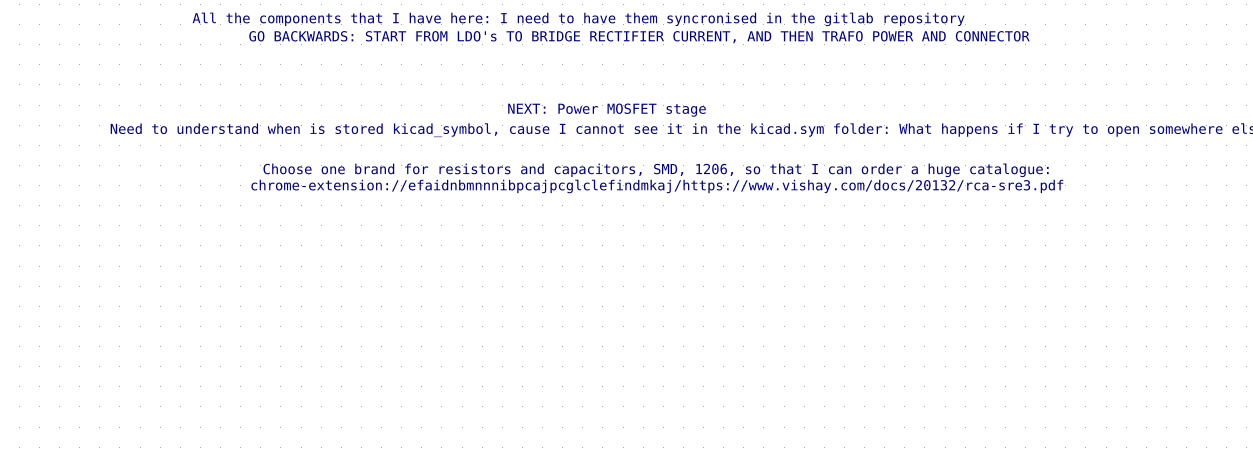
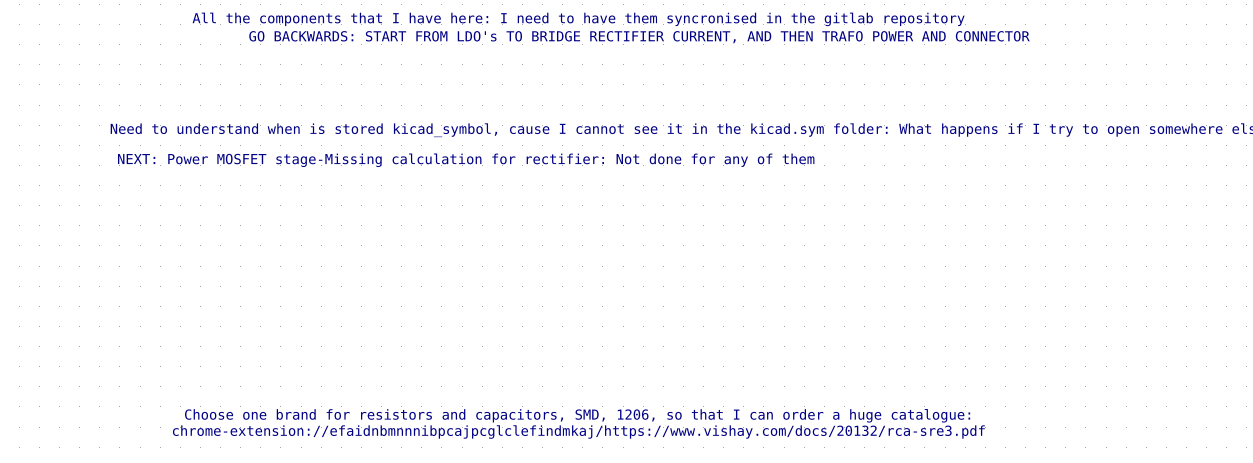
text: NEXT: Power MOSFET stage (607, 110) -> none
text: none -> NEXT: Power MOSFET stage-Missing calculation for rectifier: Not done for any of them (466, 160)
text: Choose one brand for resistors and capacitors, SMD, 1206, so that I can order a huge catalogue: (656, 170) -> none
text: chrome-extension://efaidnbmnnnibpcajpcglclefindmkaj/https://www.vishay.com/docs/20132/rca-sre3.pdf (657, 186) -> none
text: none -> Choose one brand for resistors and capacitors, SMD, 1206, so that I can order a huge catalogue: (577, 415)
text: none -> chrome-extension://efaidnbmnnnibpcajpcglclefindmkaj/https://www.vishay.com/docs/20132/rca-sre3.pdf (578, 432)

